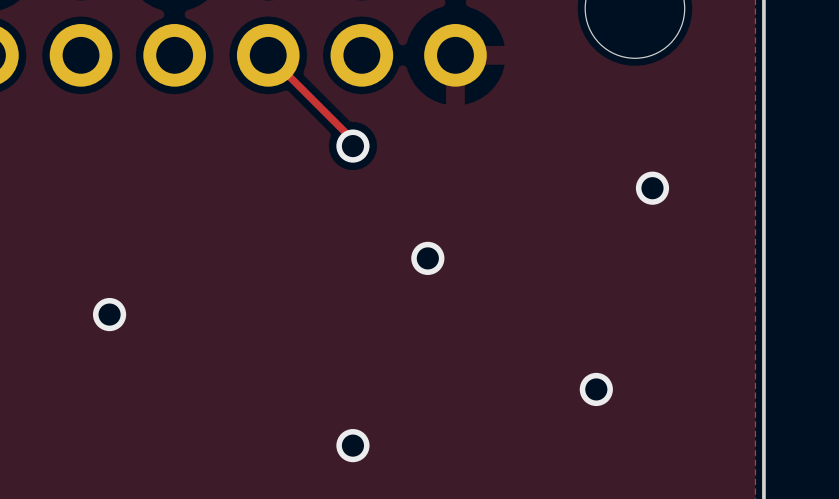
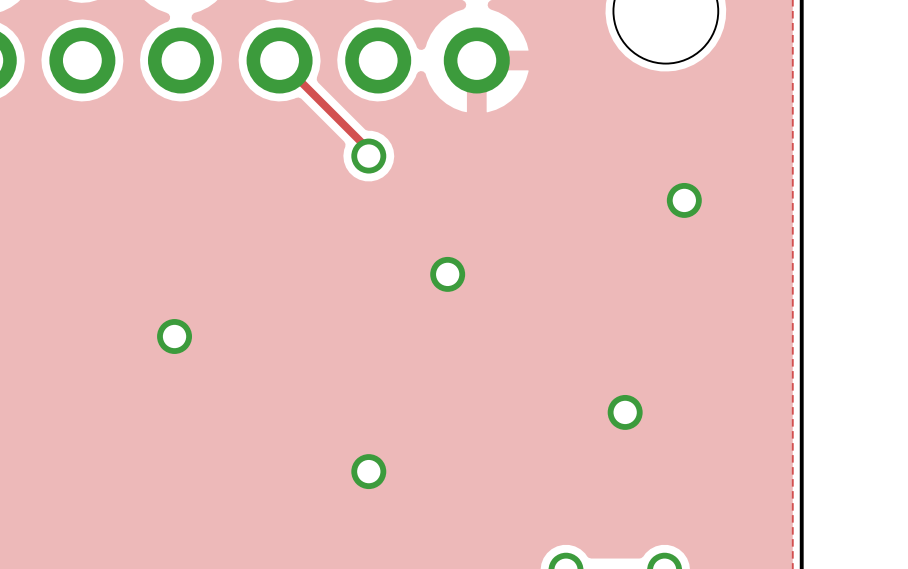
via position: (109, 314) -> (174, 336)

